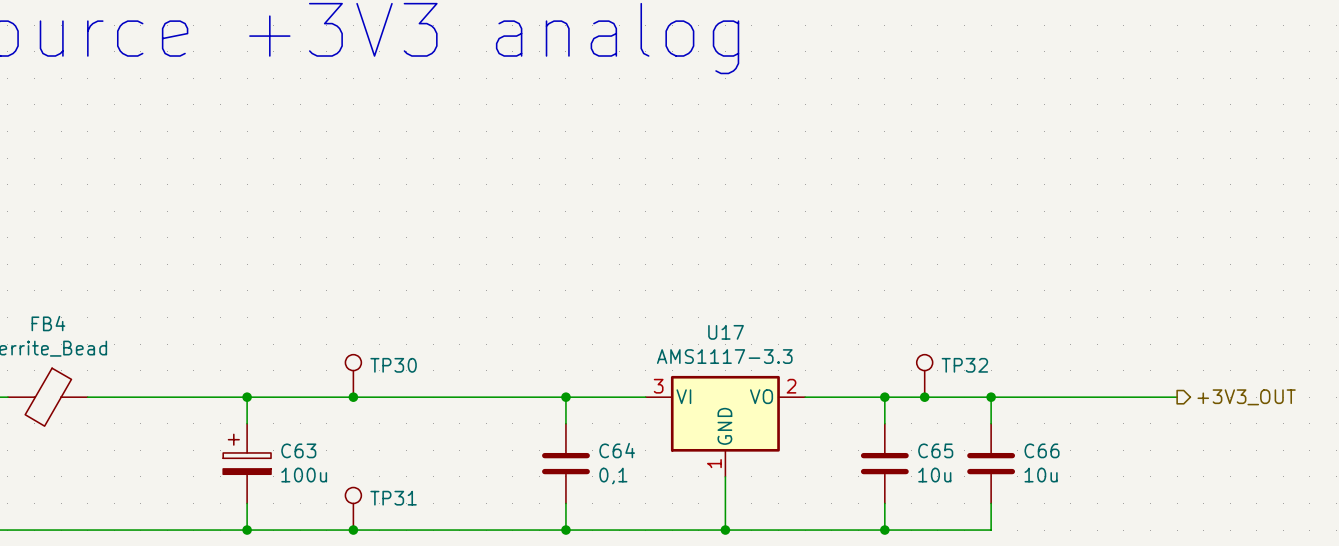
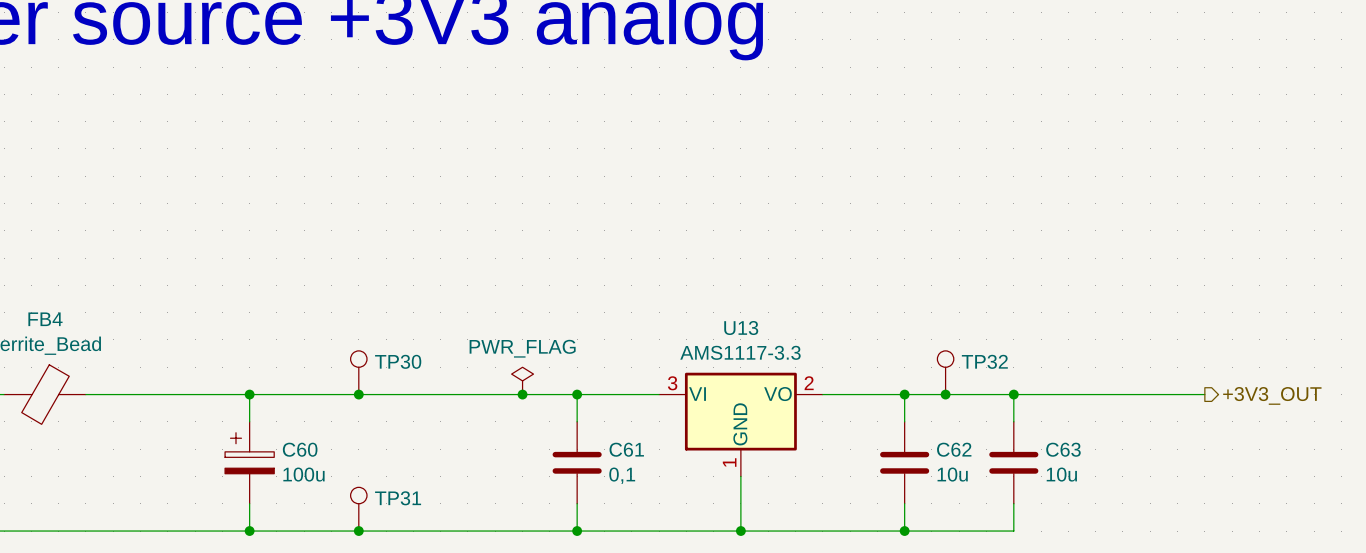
U17 name: U17 (726, 332) -> U13 (741, 328)
power symbol: none -> PWR_FLAG (522, 380)
junction: none -> (522, 394)
C63 name: C63 (298, 450) -> C60 (300, 449)
C64 name: C64 (617, 450) -> C61 (626, 449)
C65 name: C65 (935, 450) -> C62 (954, 449)
C66 name: C66 (1042, 450) -> C63 (1063, 449)

